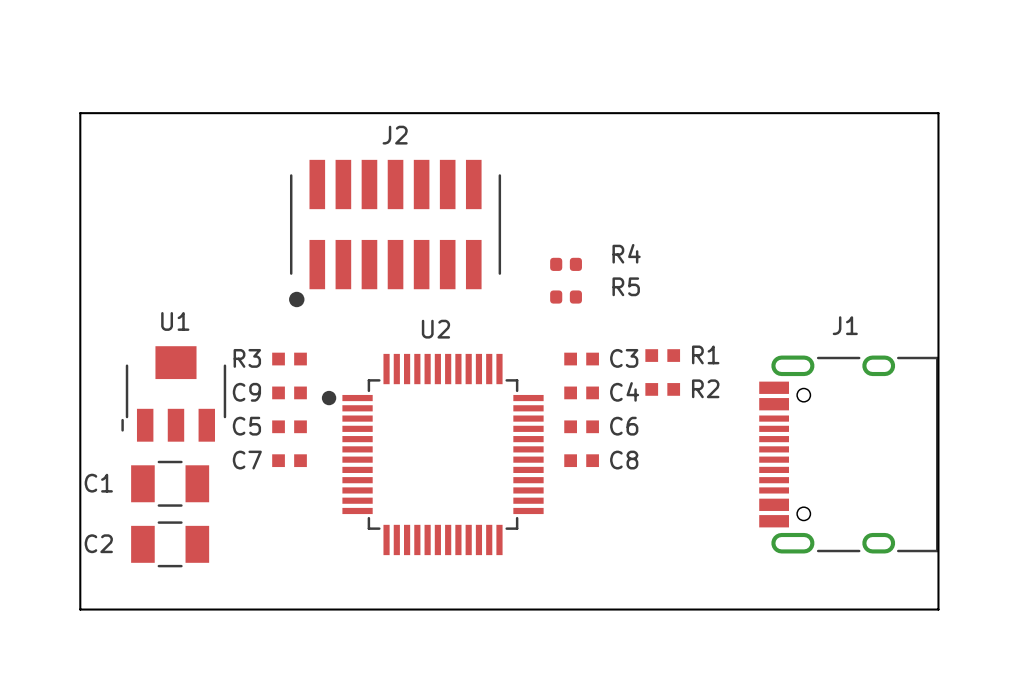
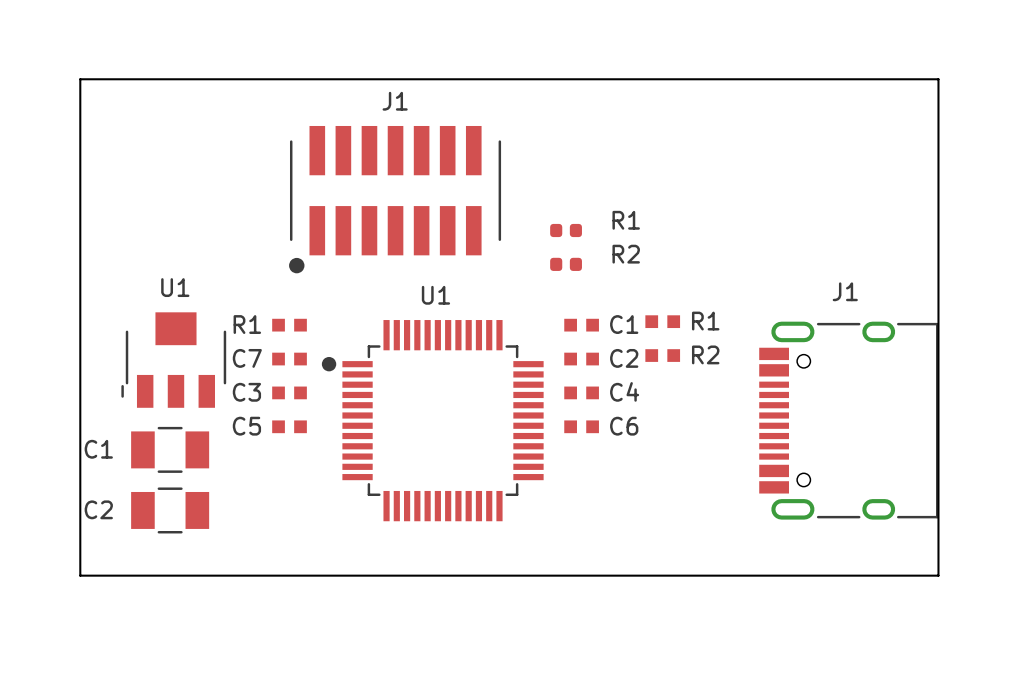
board edge: (80, 113) (938, 113) -> (80, 113) (80, 79) (938, 79) (938, 113)
J1: none -> (395, 199)
R1: none -> (566, 230)
J2: (395, 233) -> none
R4 name: R4 (626, 253) -> R2 (626, 254)
R5: (566, 297) -> none
R1: none -> (662, 321)
R1: none -> (289, 325)
C1: none -> (581, 325)
R1 name: R1 (705, 354) -> R2 (705, 354)
R3 name: R3 (247, 358) -> C7 (247, 358)
C3 name: C3 (624, 358) -> C2 (624, 358)
R2: (662, 389) -> none
C9 name: C9 (246, 392) -> C3 (246, 392)
U1 position: (173, 393) -> (173, 360)
U1: none -> (432, 420)
U2: (432, 454) -> none
J1 position: (848, 454) -> (848, 420)
C7: (289, 460) -> none
C8: (581, 460) -> none
C1 position: (170, 483) -> (170, 449)
C2 position: (170, 544) -> (170, 510)
board edge: (80, 575) (80, 609) (938, 609) (938, 575) -> (80, 575) (938, 575)

